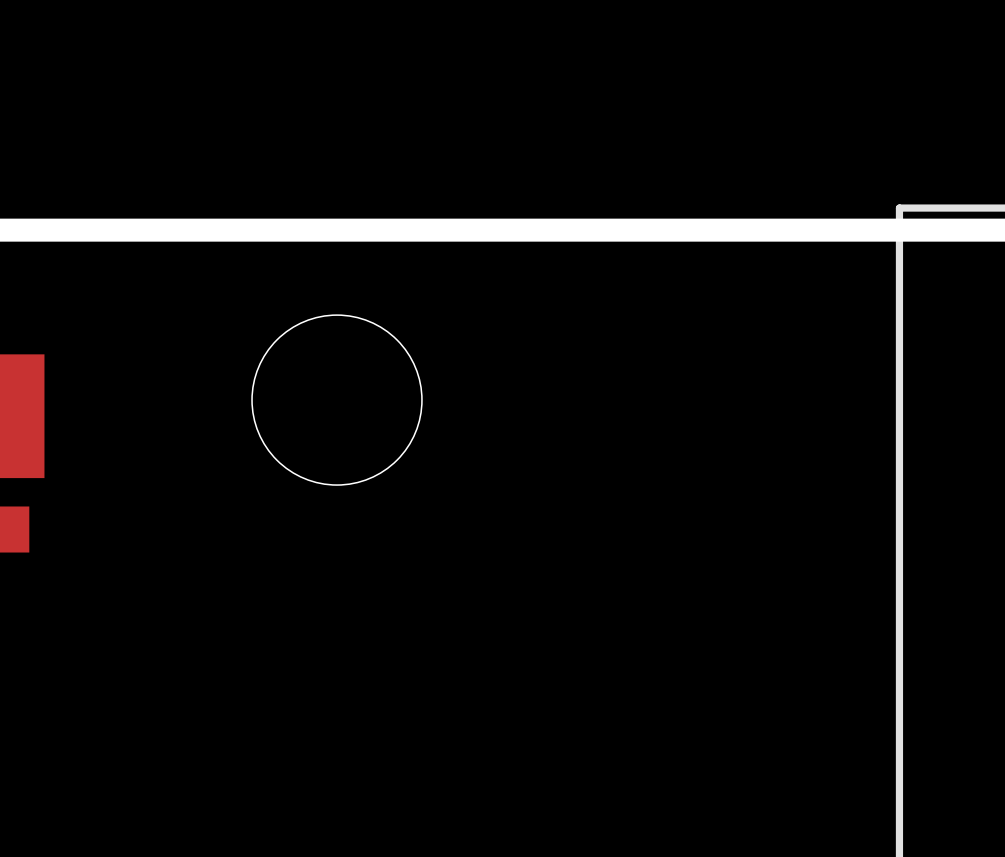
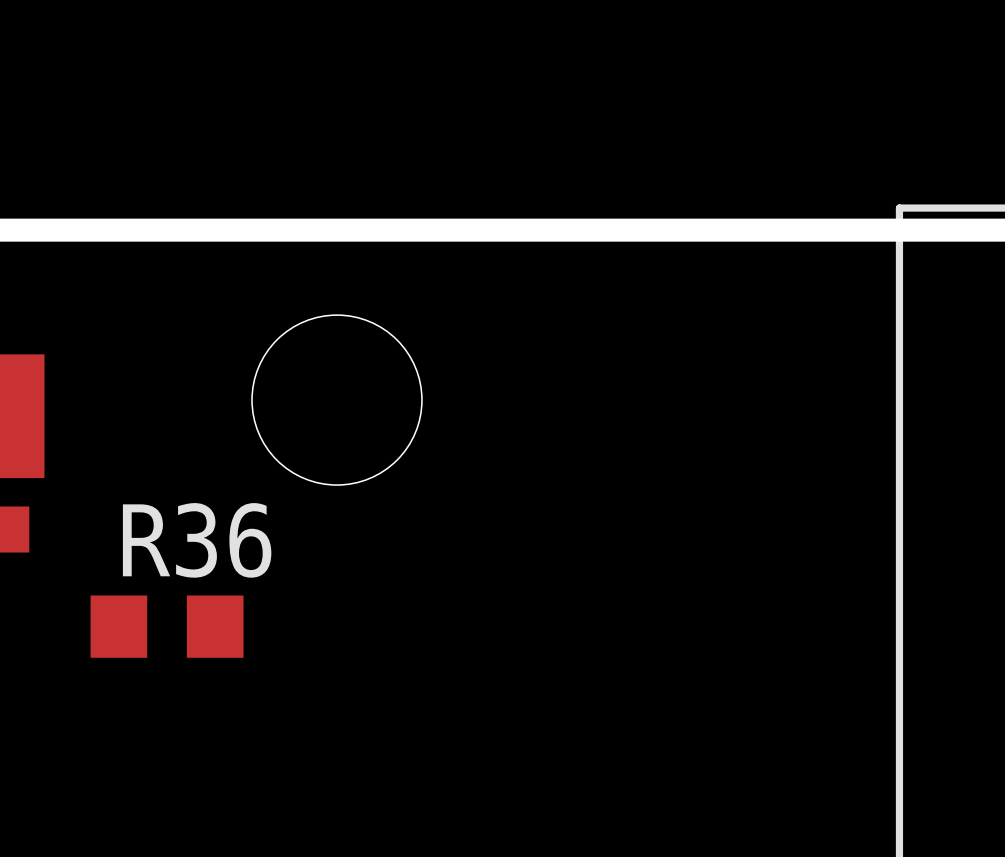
R36: none -> (167, 626)

